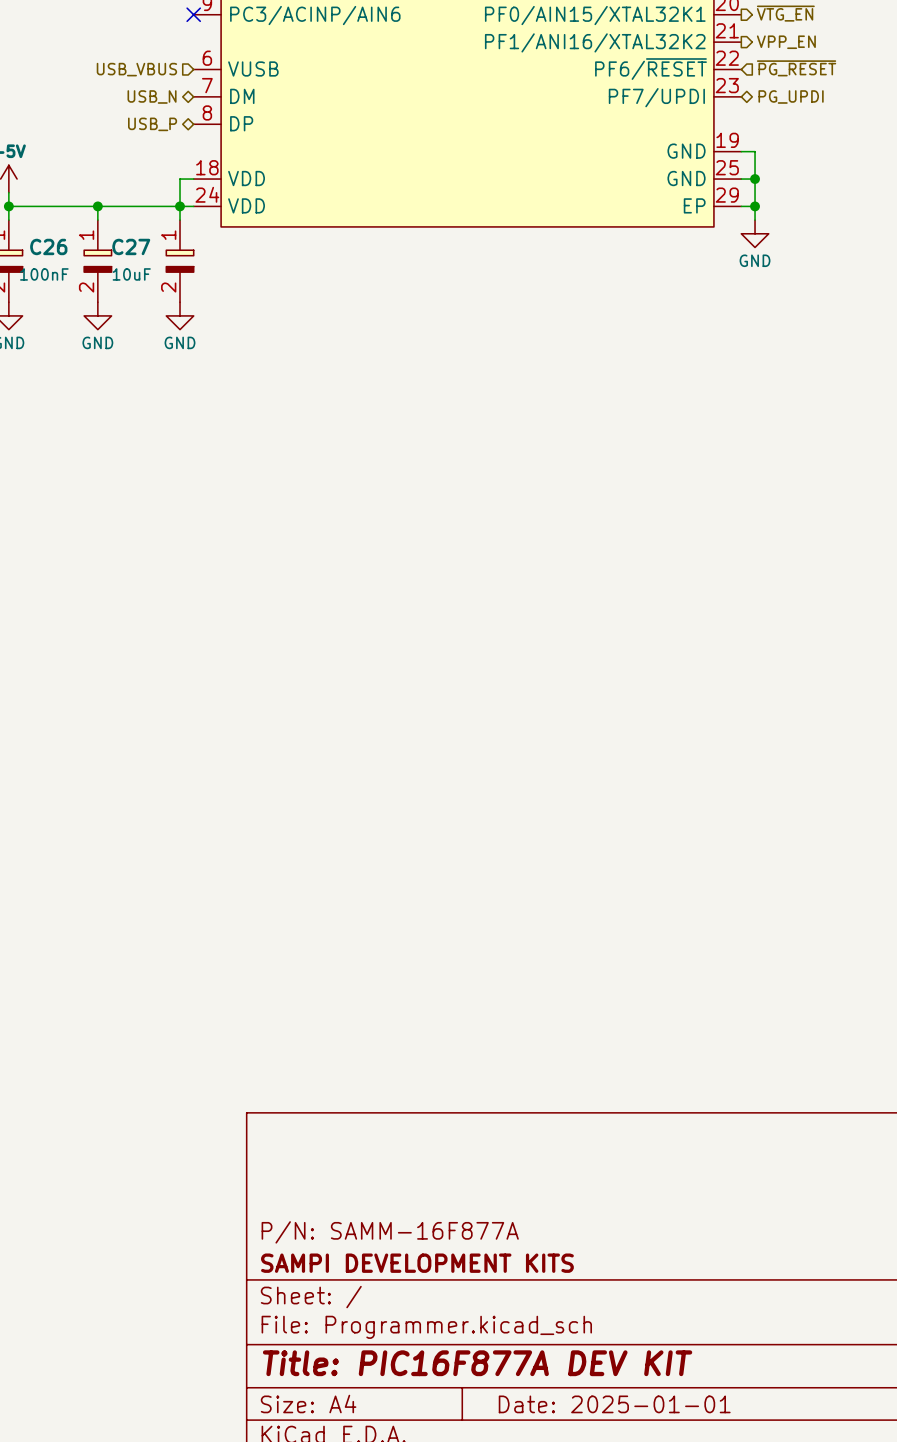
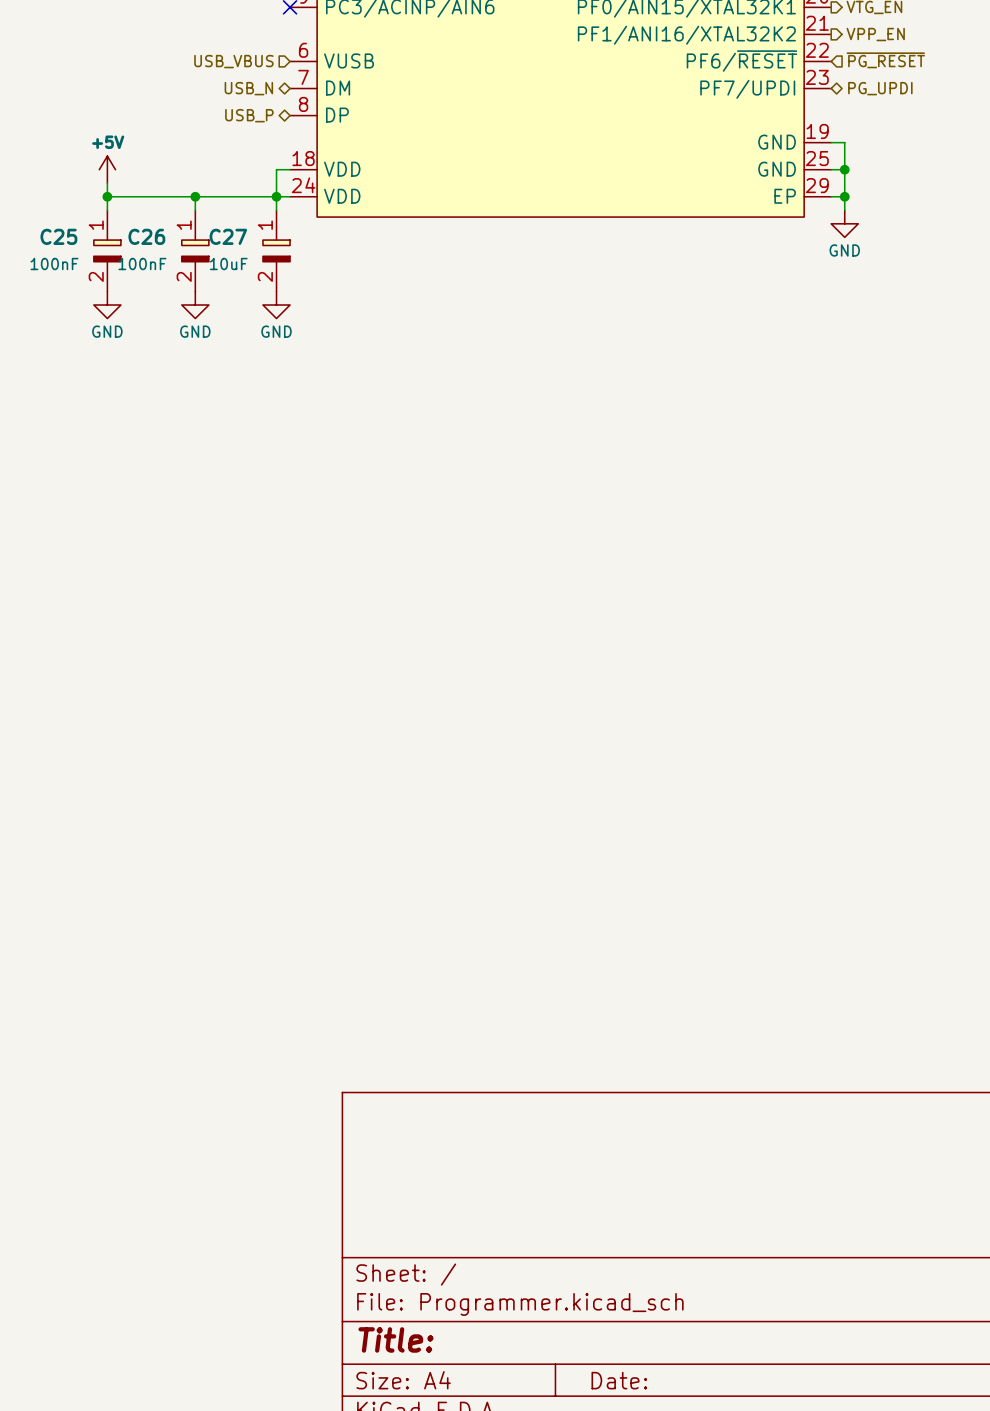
title block: P/N: SAMM-16F877A (390, 1232) -> none
title block: SAMPI DEVELOPMENT KITS (417, 1263) -> none
title block: Title: PIC16F877A DEV KIT (477, 1363) -> Title: (395, 1339)
title block: Date: 2025-01-01 (614, 1404) -> Date: (619, 1380)

